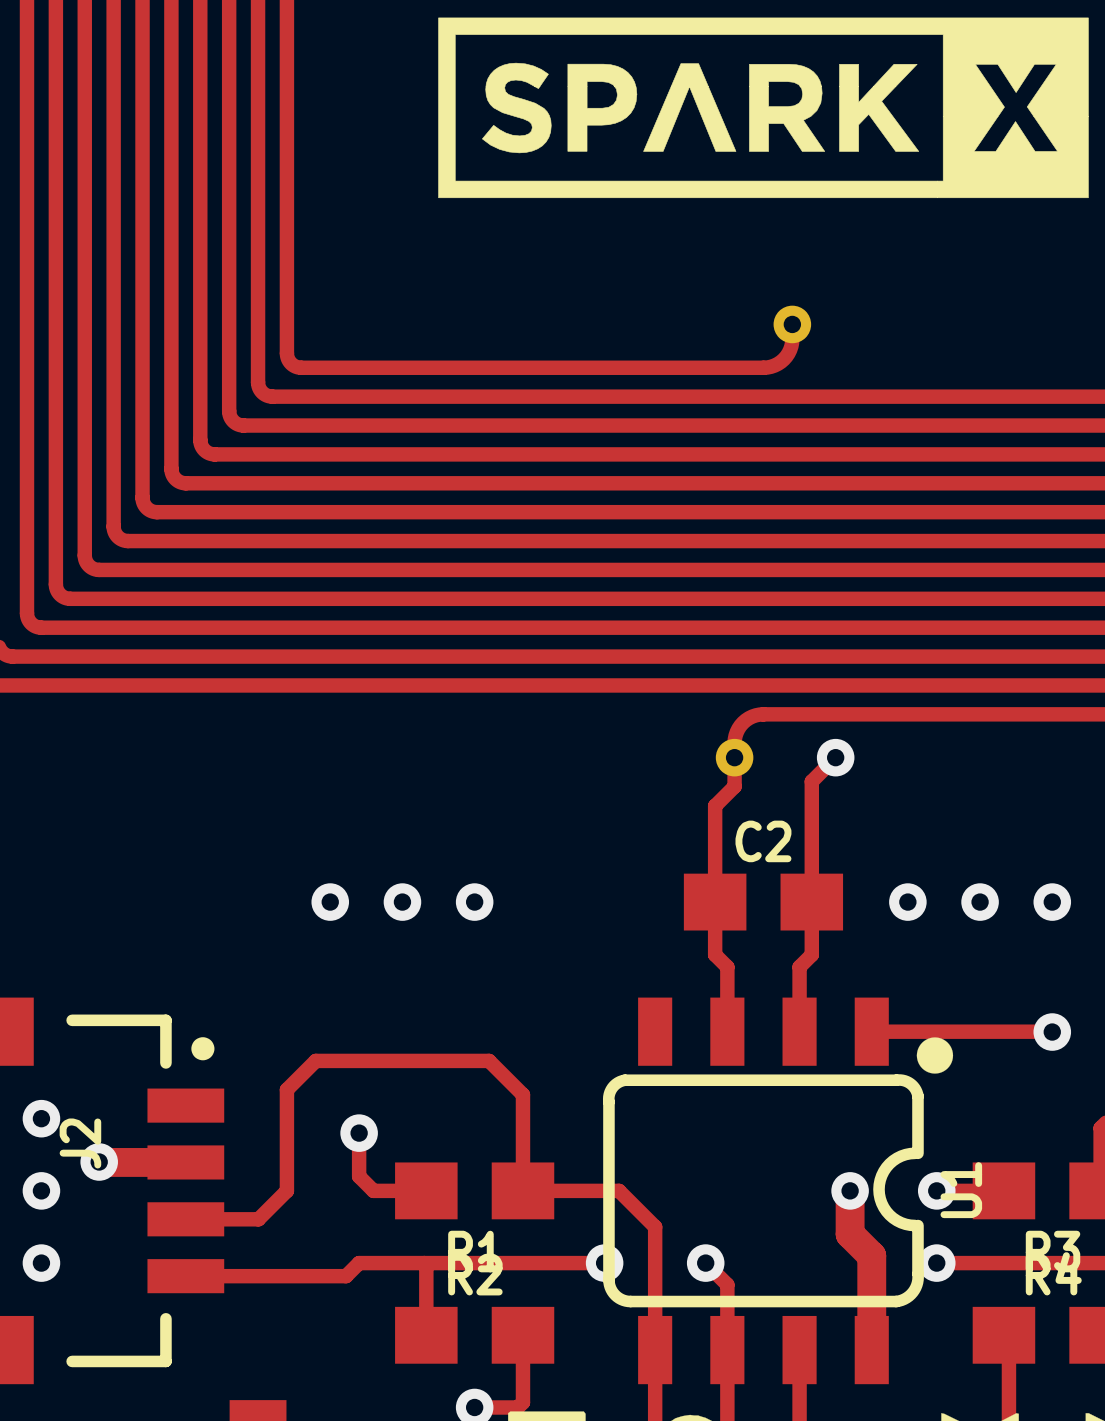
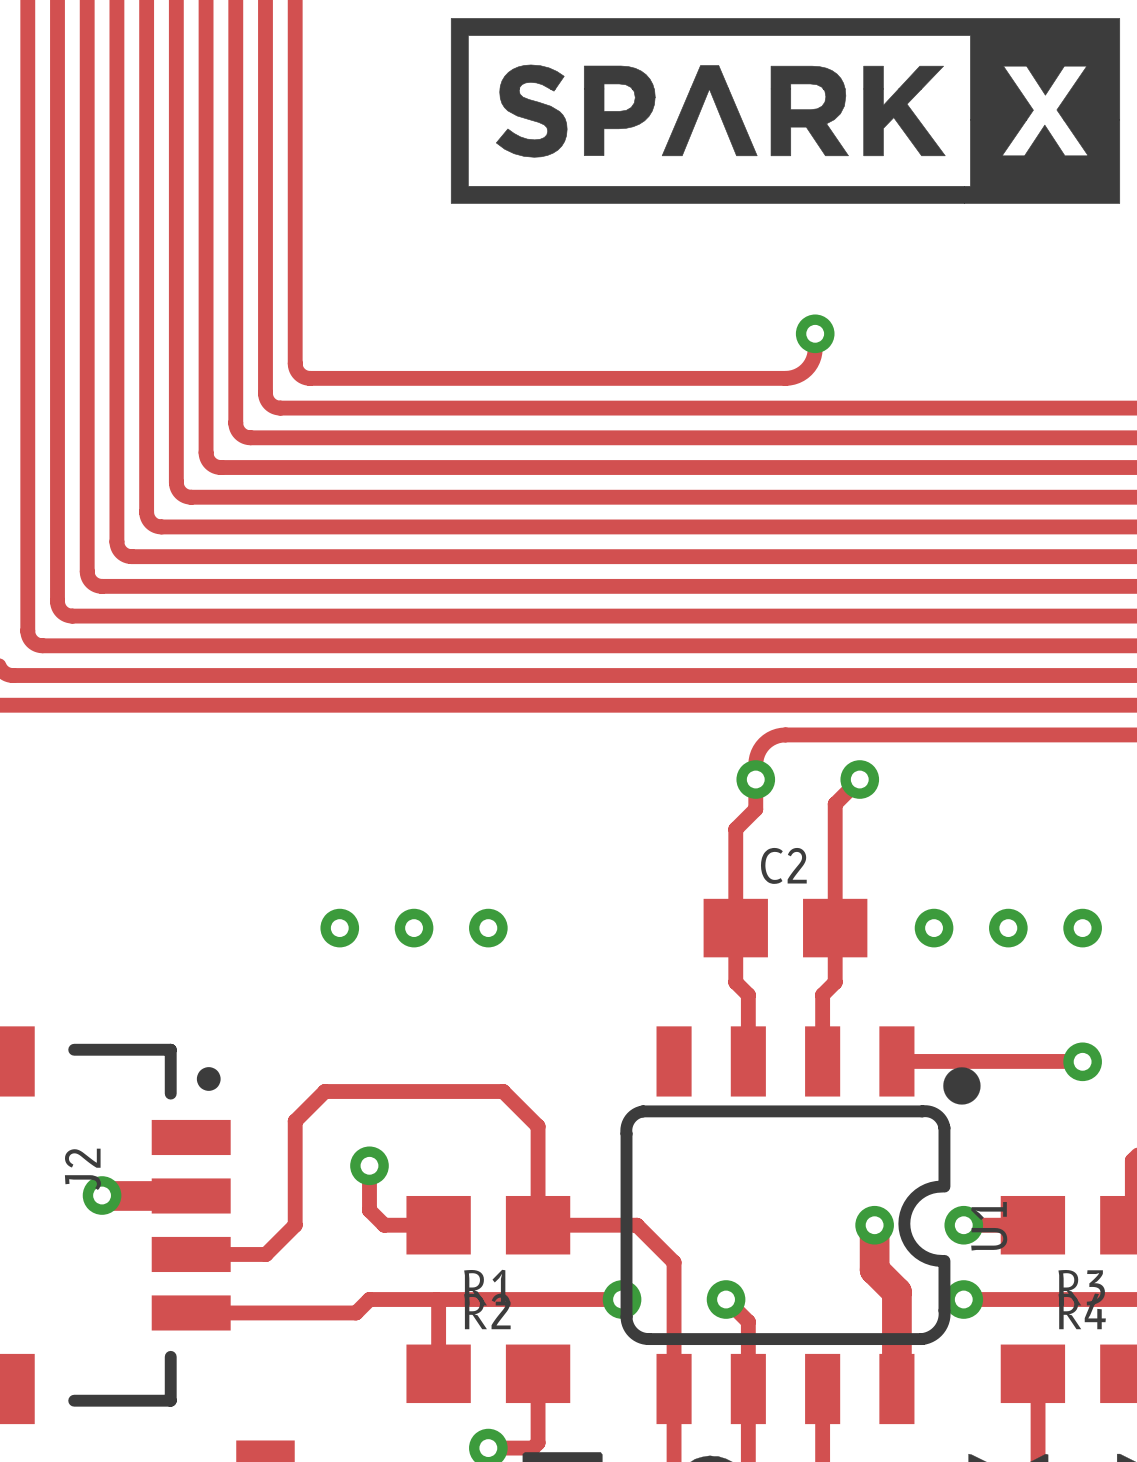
via: (41, 1118) -> none
via: (41, 1190) -> none
via: (41, 1263) -> none

